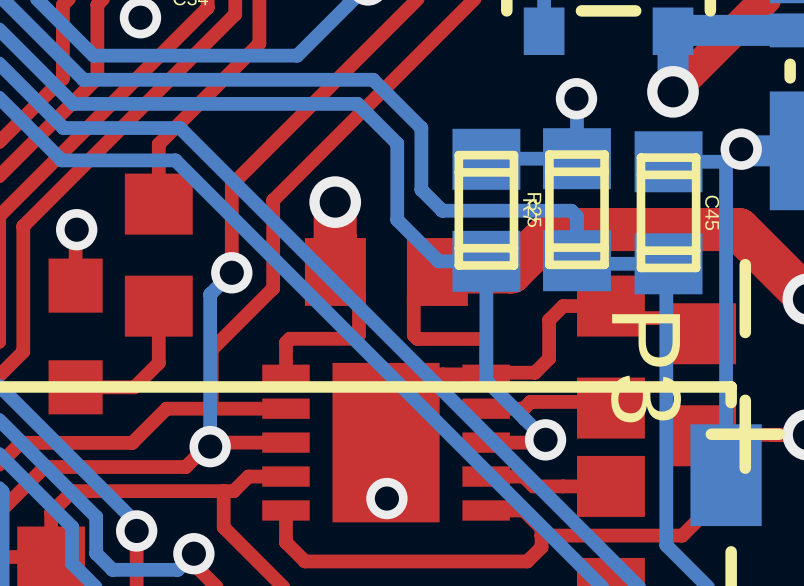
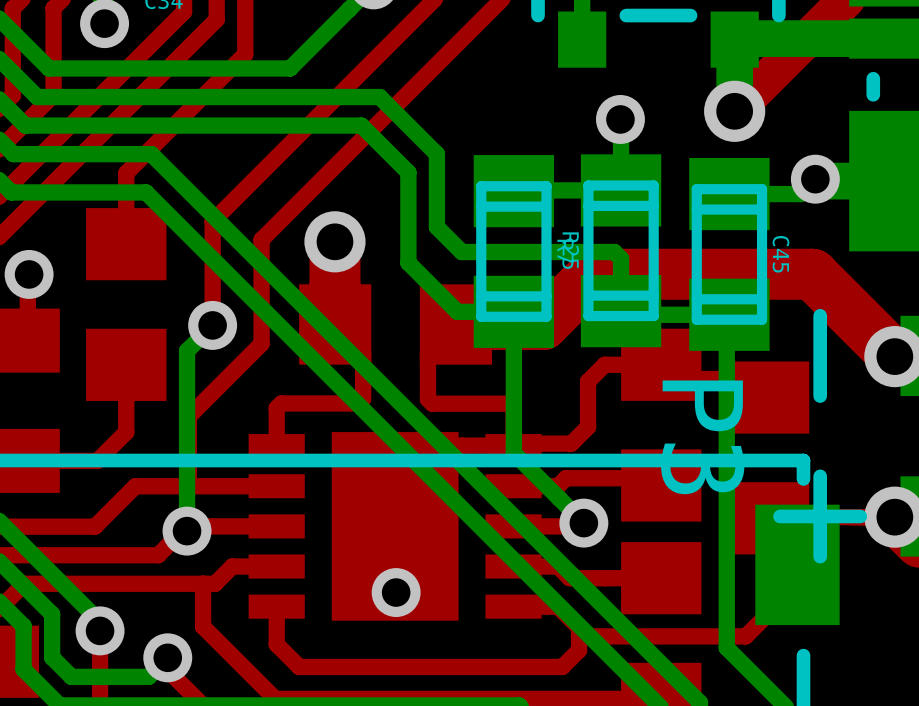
bottom track: (728, 161) (726, 164) (726, 475) -> none

